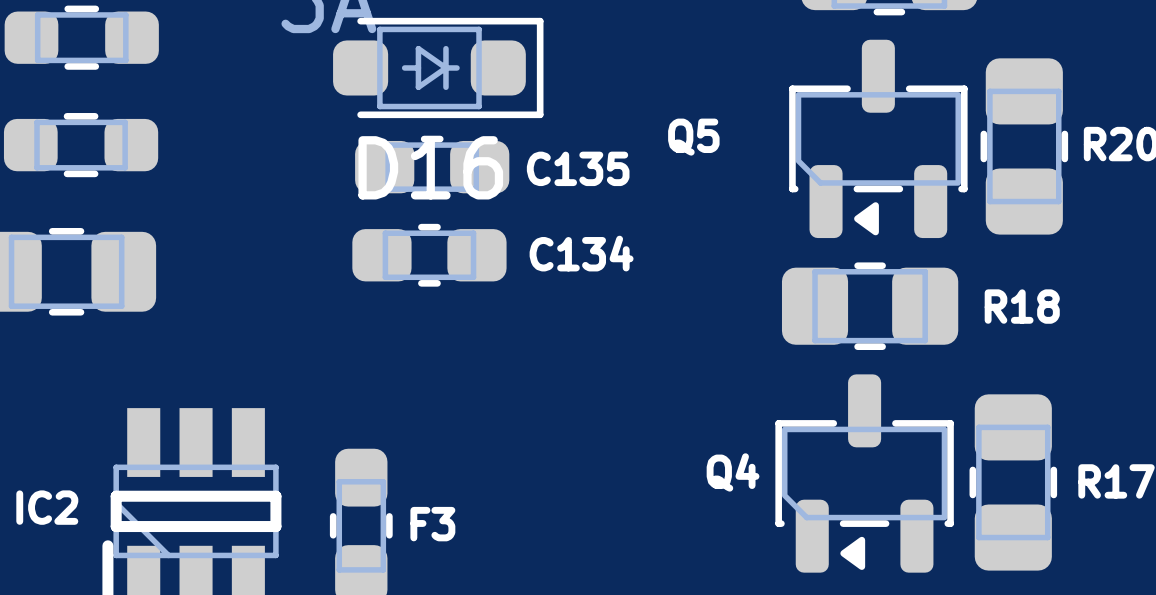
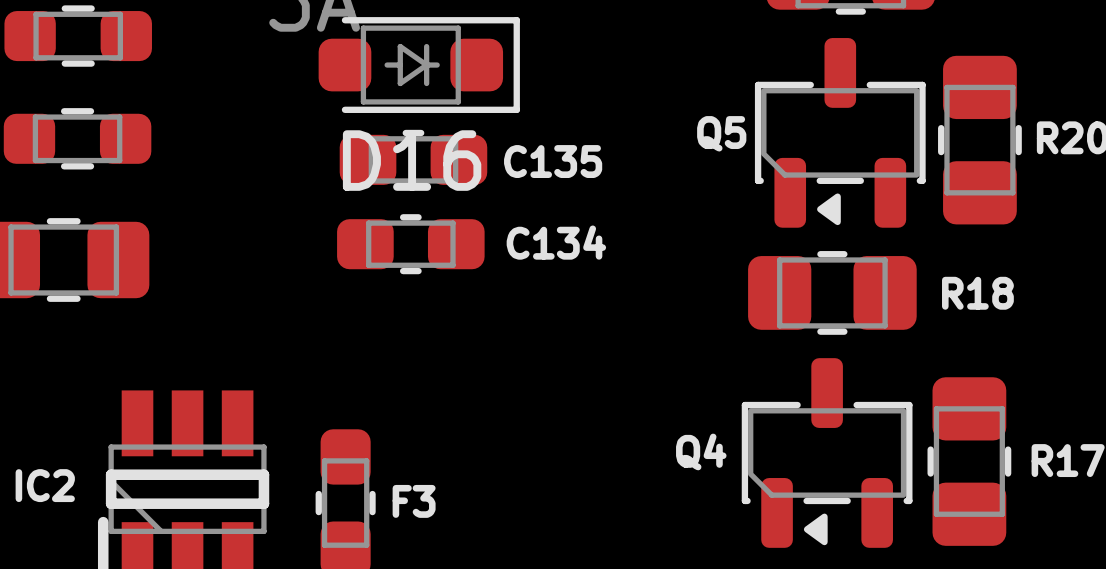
Q5 name position: Q5 (693, 137) -> Q5 (721, 133)

